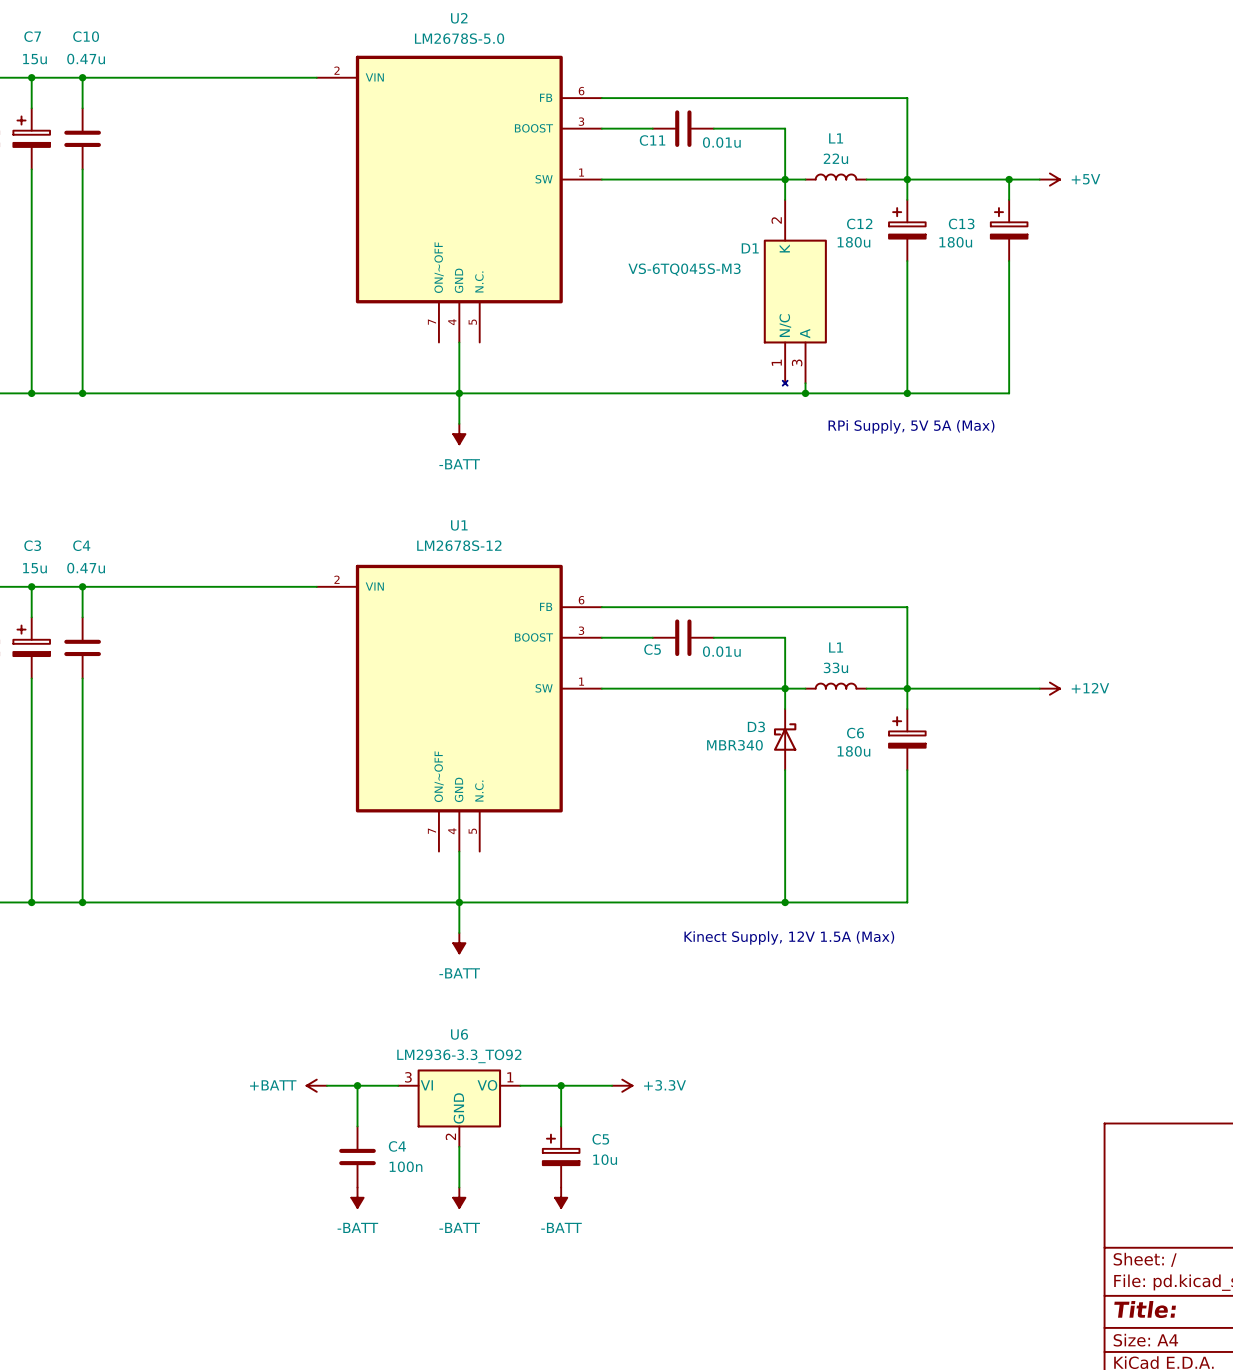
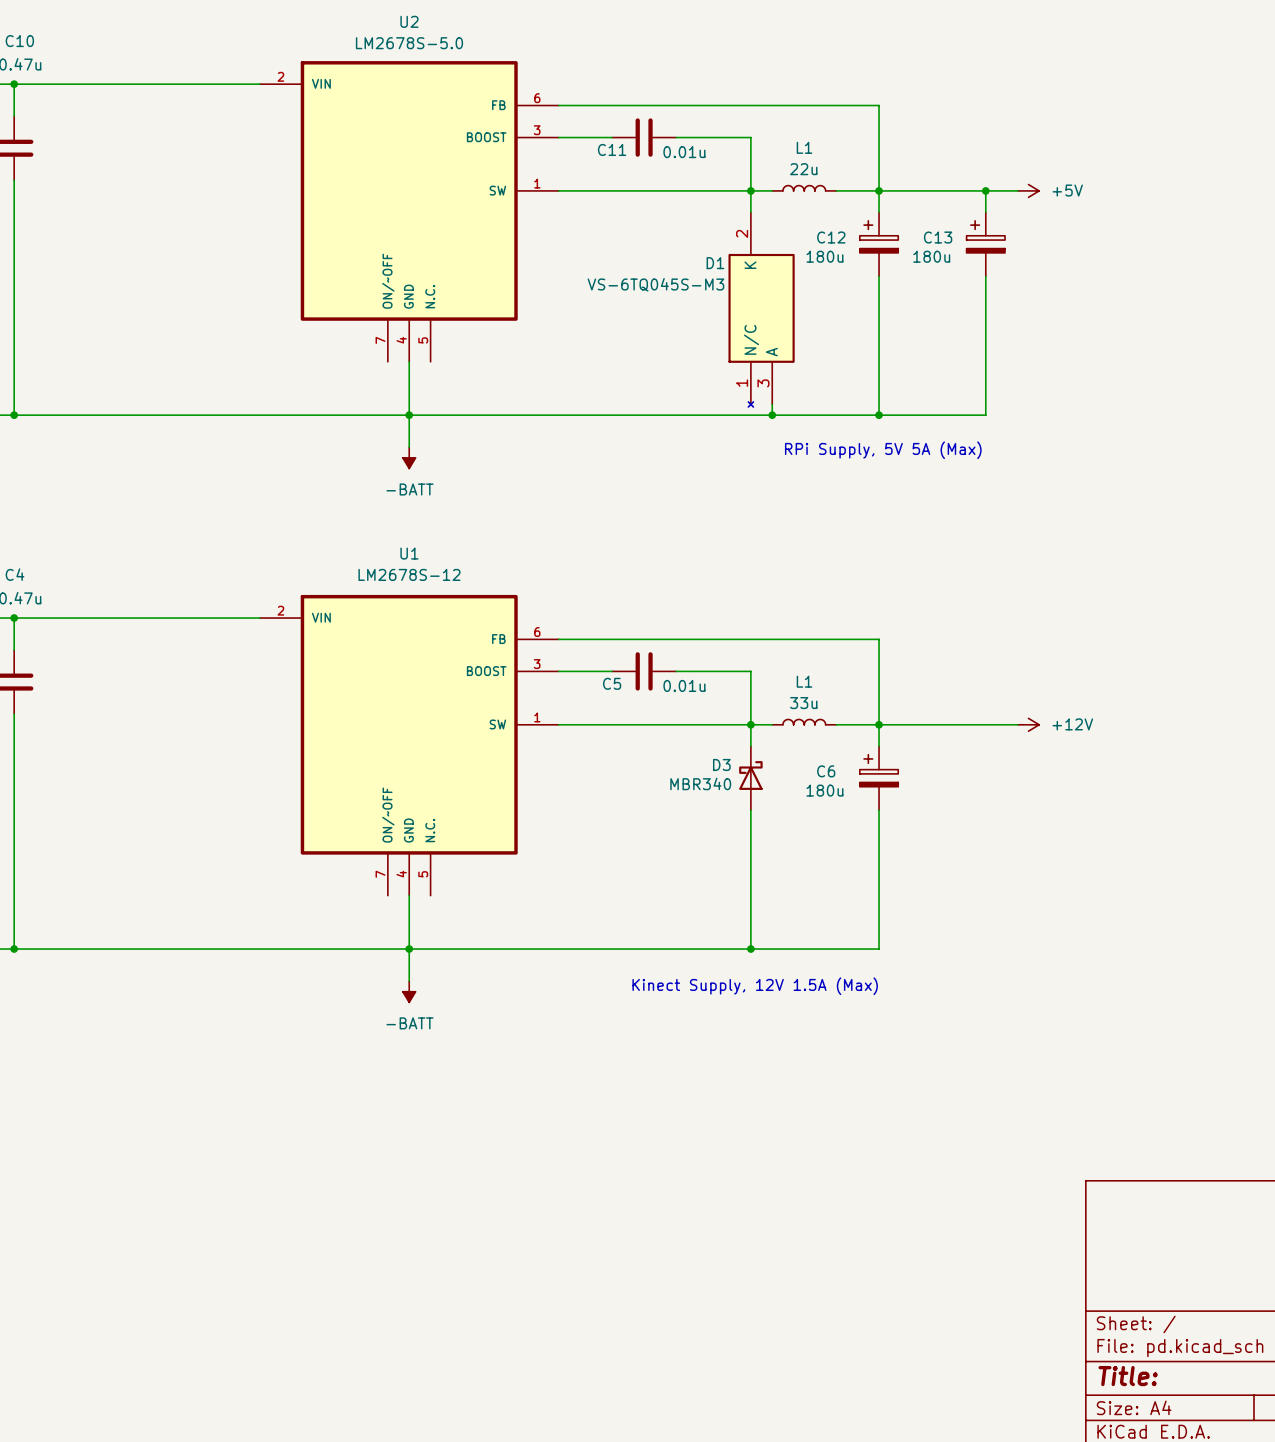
power symbol: +BATT (316, 1085) -> none
wire: (326, 1085) (398, 1085) -> none
wire: (357, 1085) (357, 1126) -> none
junction: (357, 1085) -> none
wire: (520, 1085) (612, 1085) -> none
wire: (561, 1085) (561, 1126) -> none
junction: (561, 1085) -> none
power symbol: +3.3V (622, 1085) -> none
U6: LM2936-3.3_TO92 (459, 1108) -> none
wire: (459, 1146) (459, 1187) -> none
C4: 100n (357, 1157) -> none
C5: 10u (561, 1157) -> none
power symbol: -BATT (357, 1197) -> none
power symbol: -BATT (459, 1197) -> none
power symbol: -BATT (561, 1197) -> none

